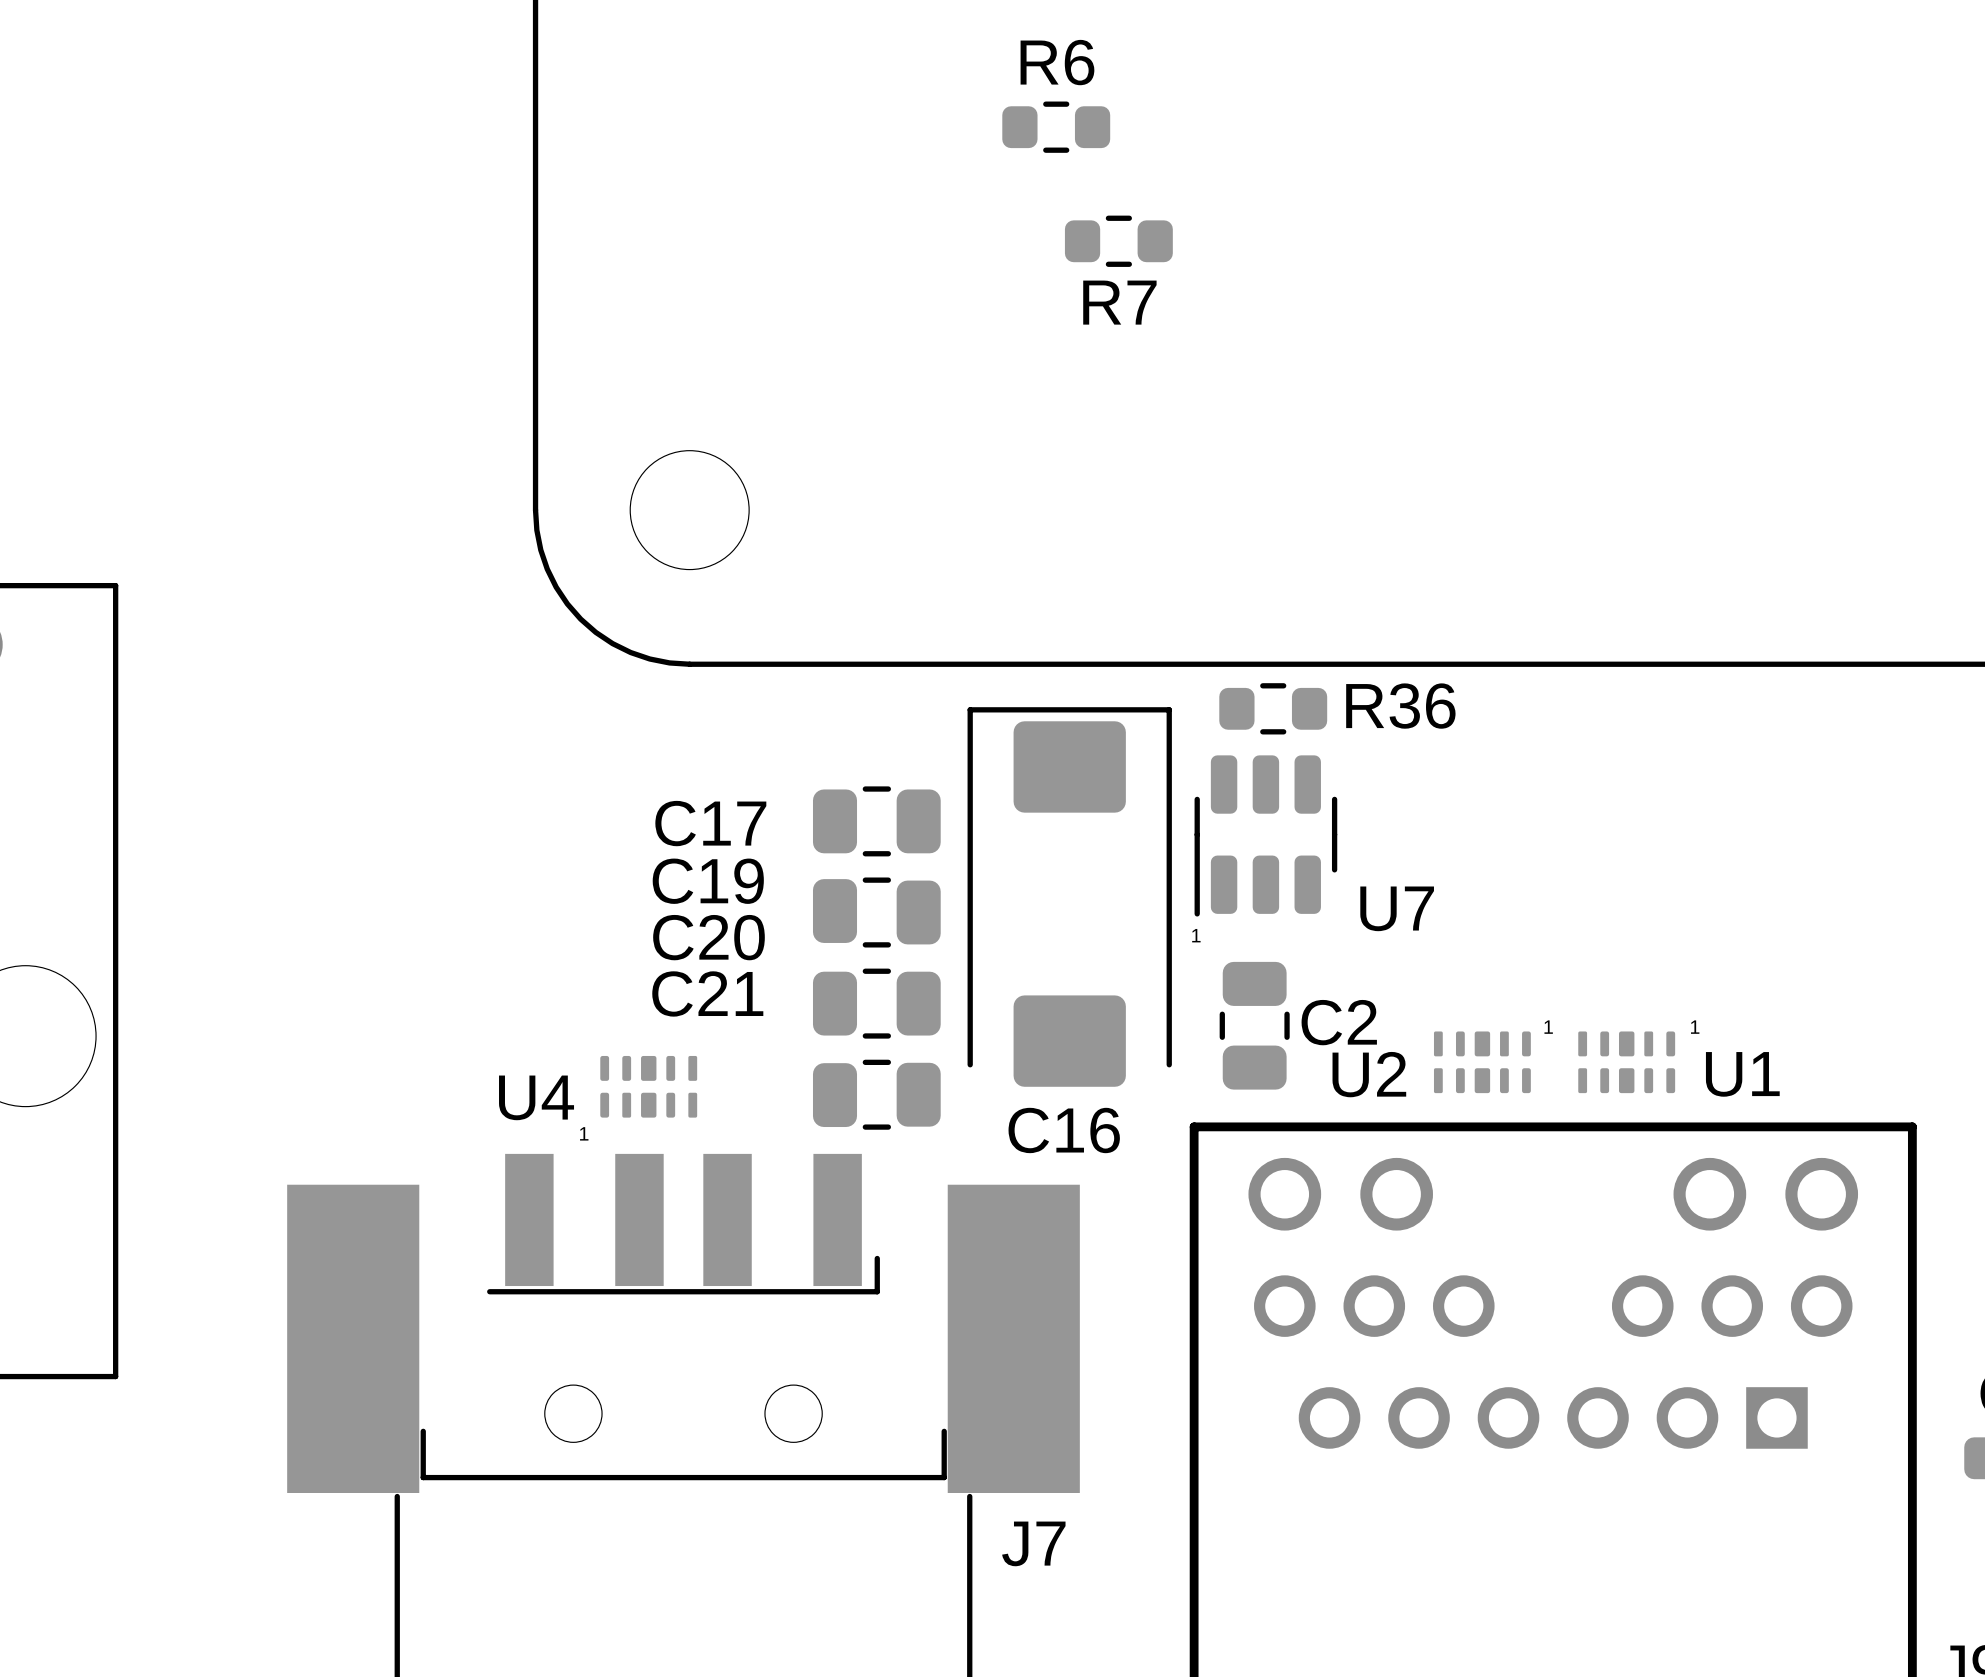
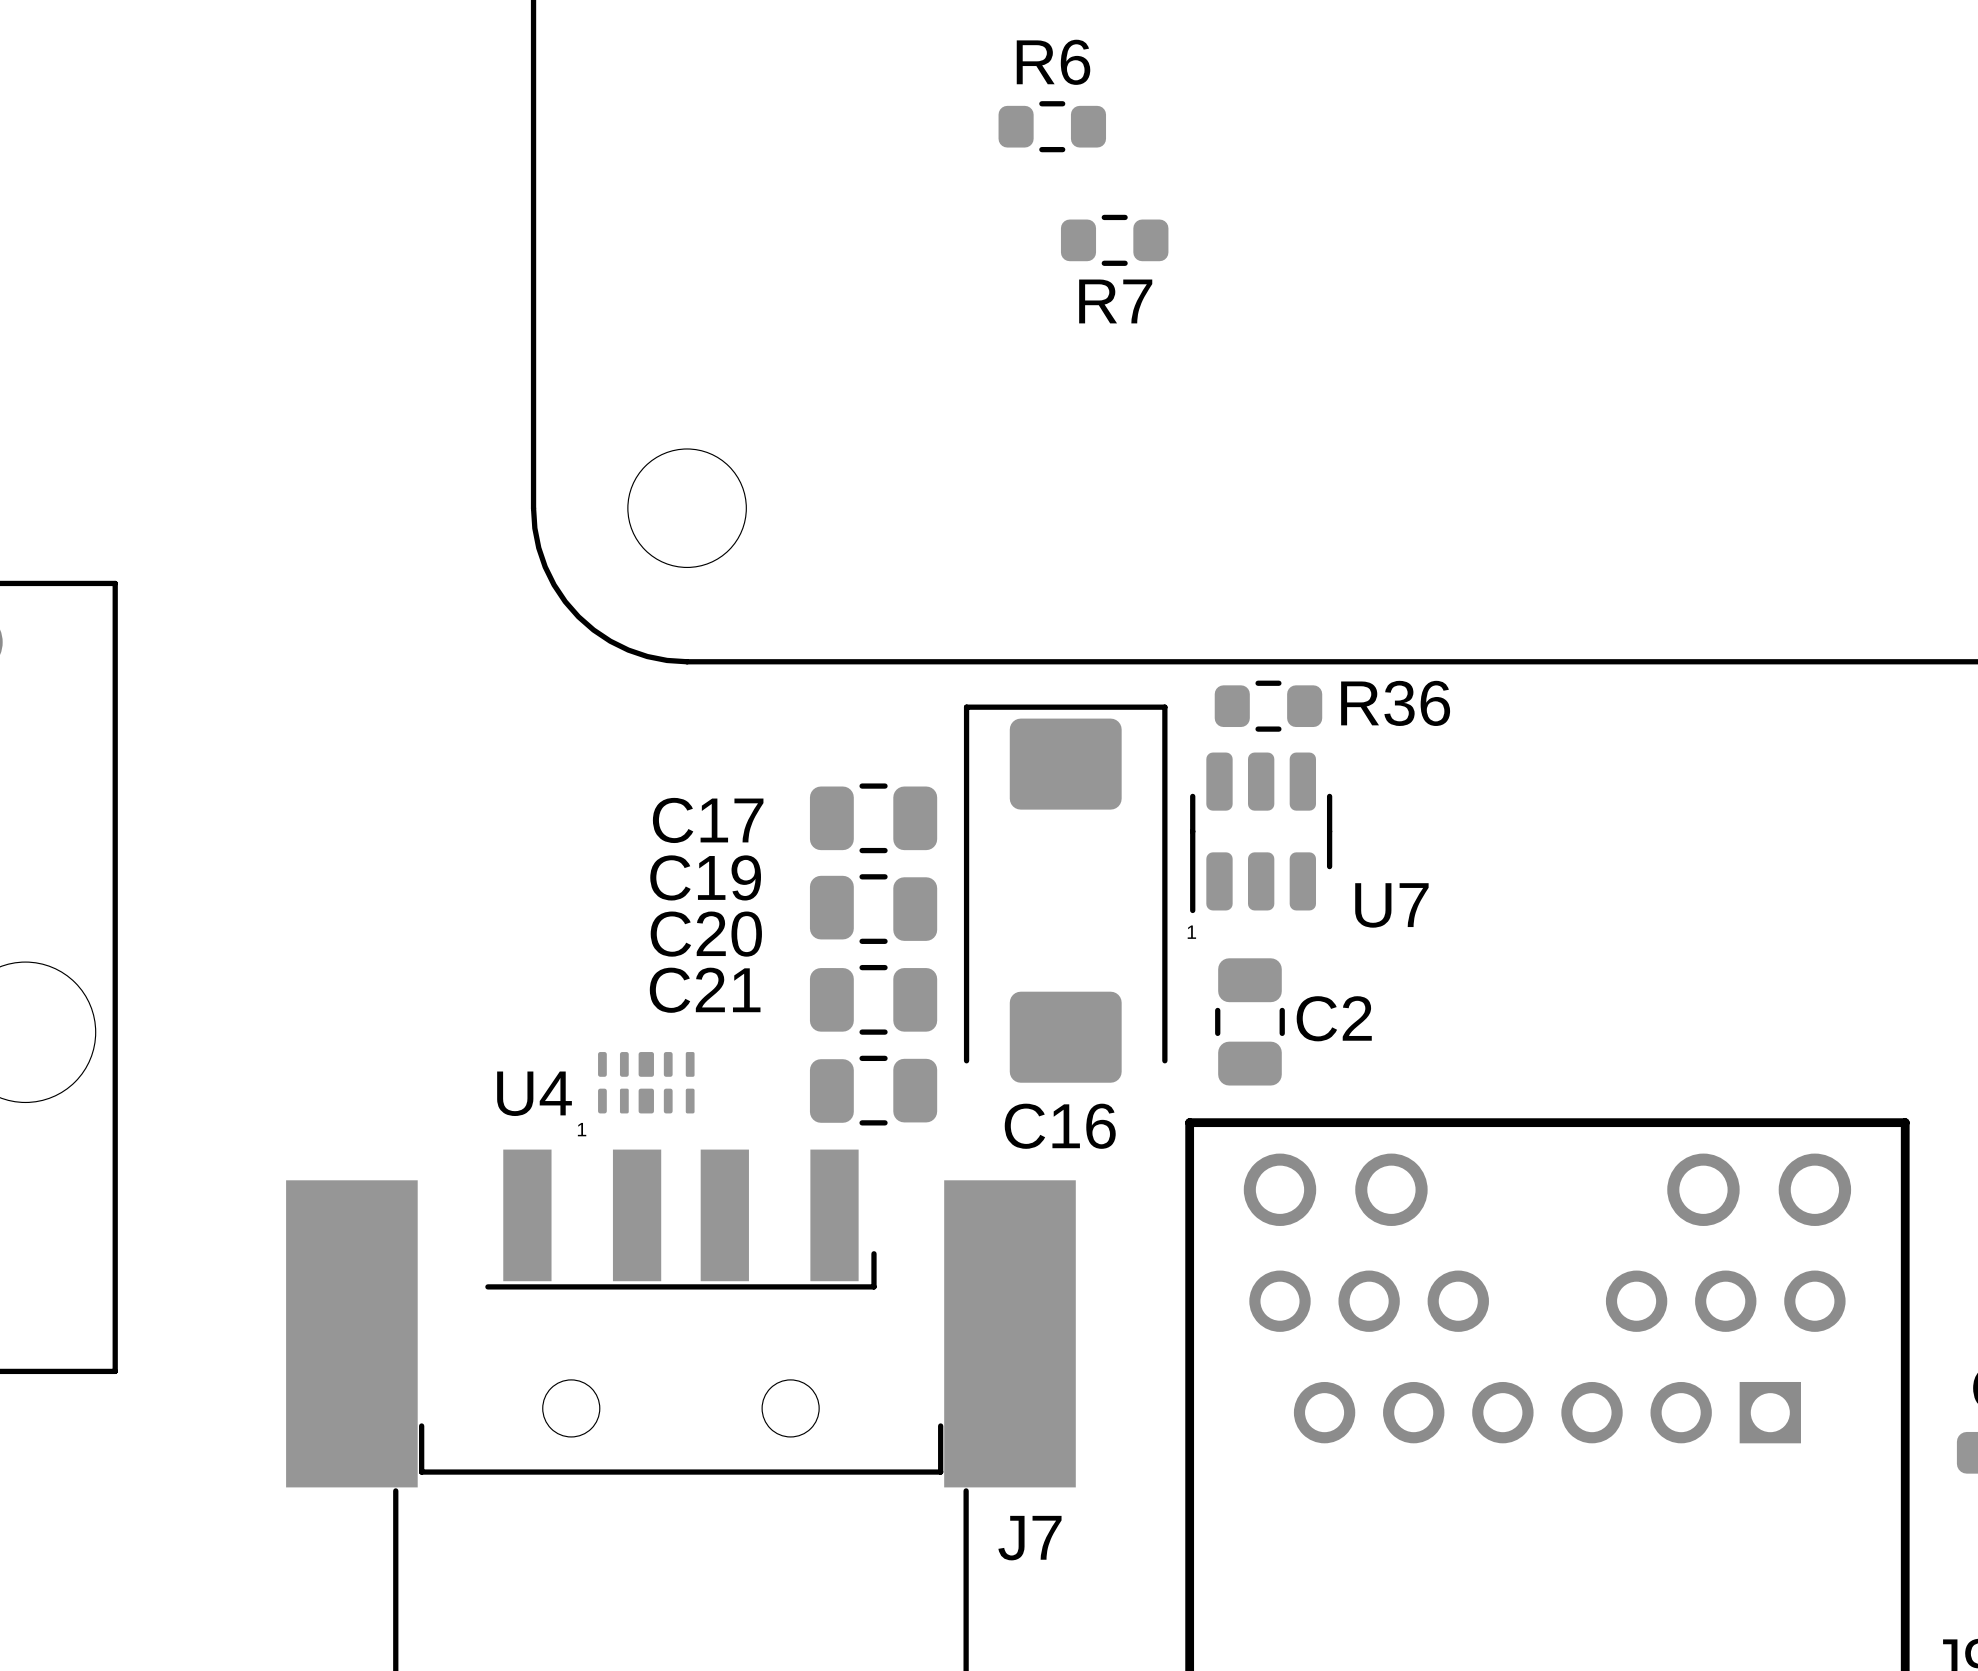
text: 1 (1548, 1027) -> none
text: 1 (1695, 1027) -> none
U2: (1482, 1062) -> none
U1: (1626, 1062) -> none

